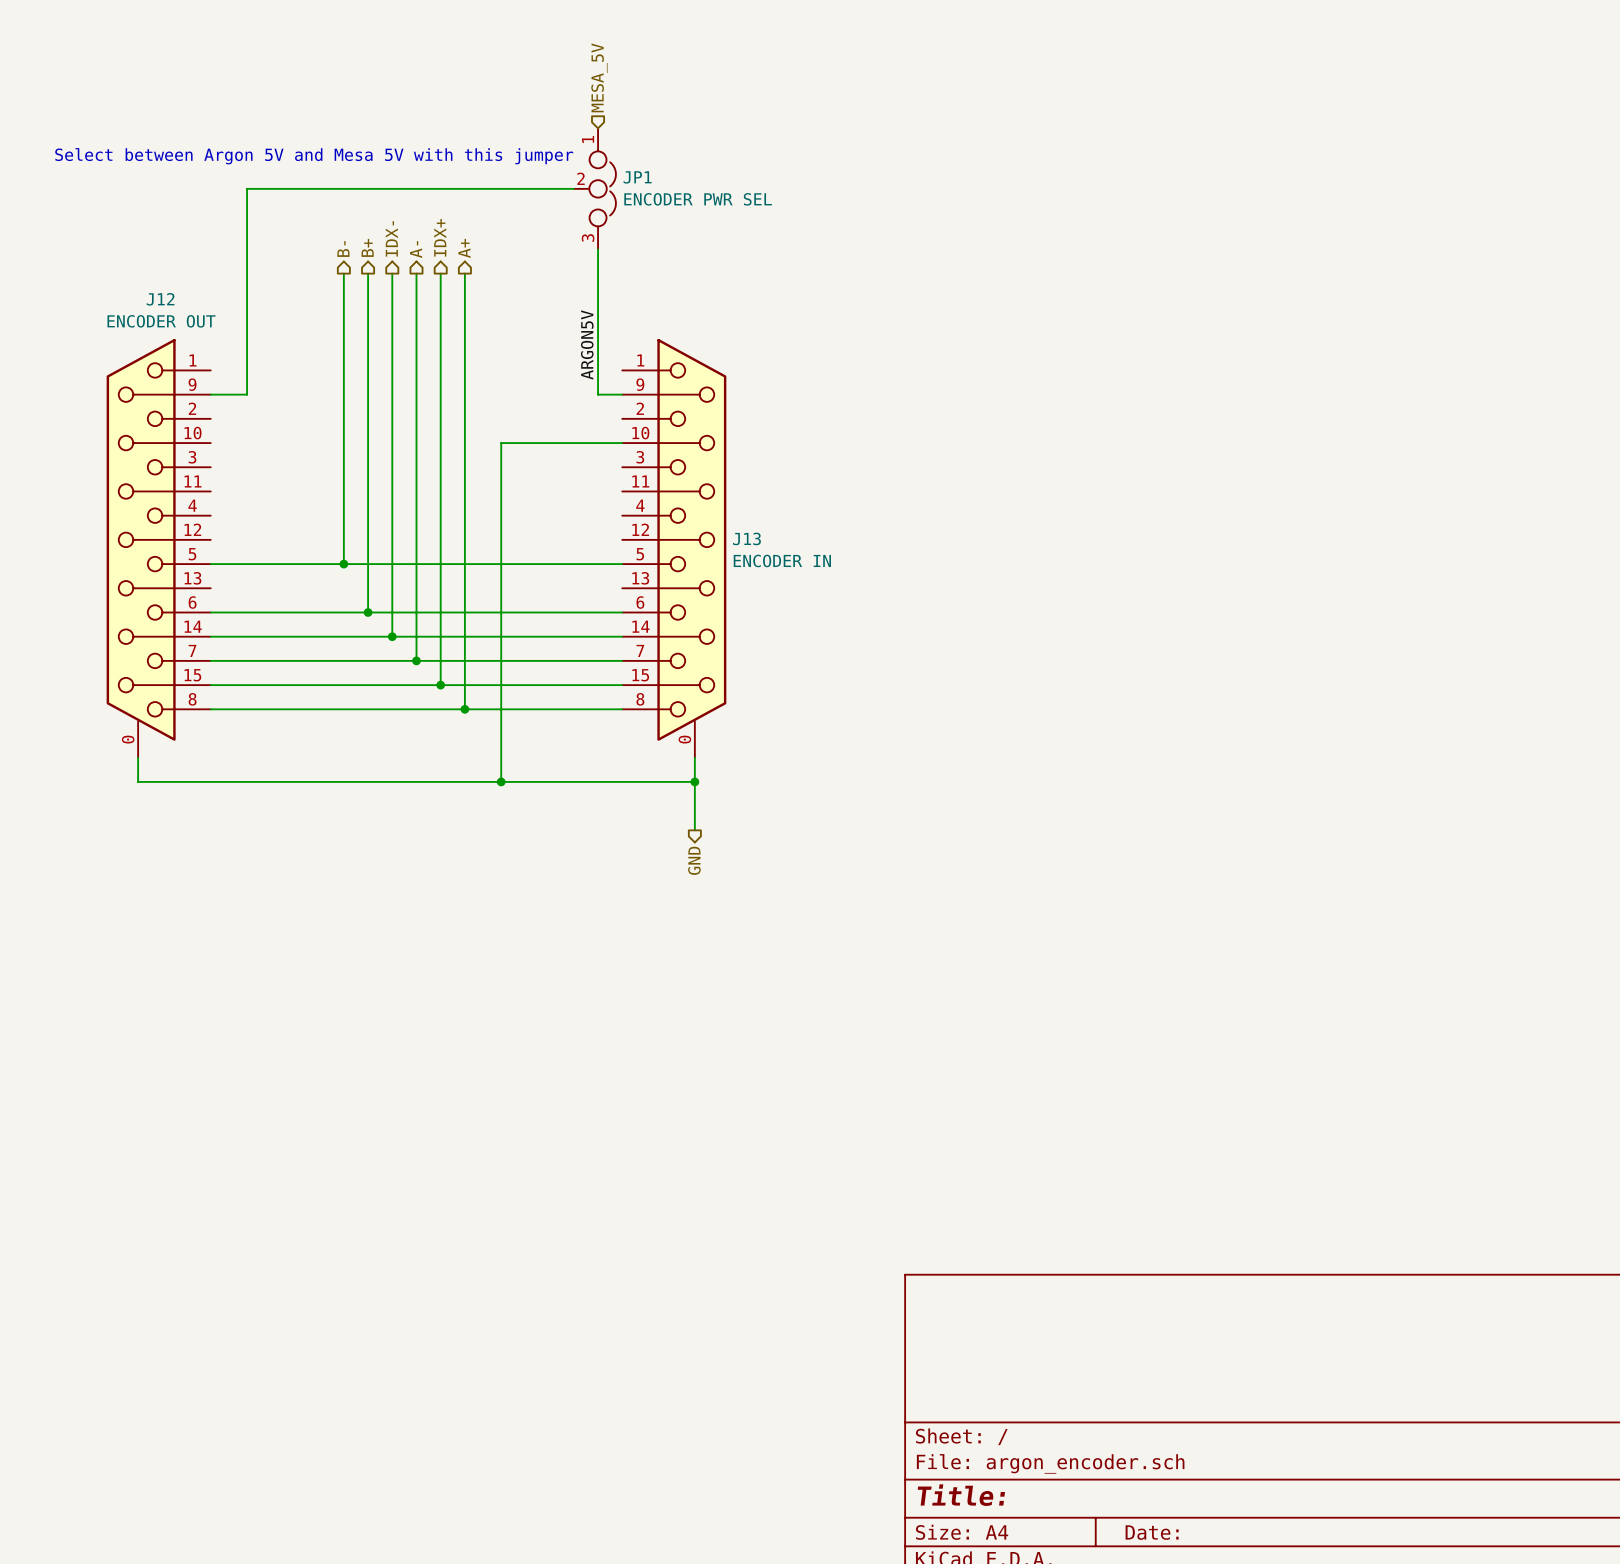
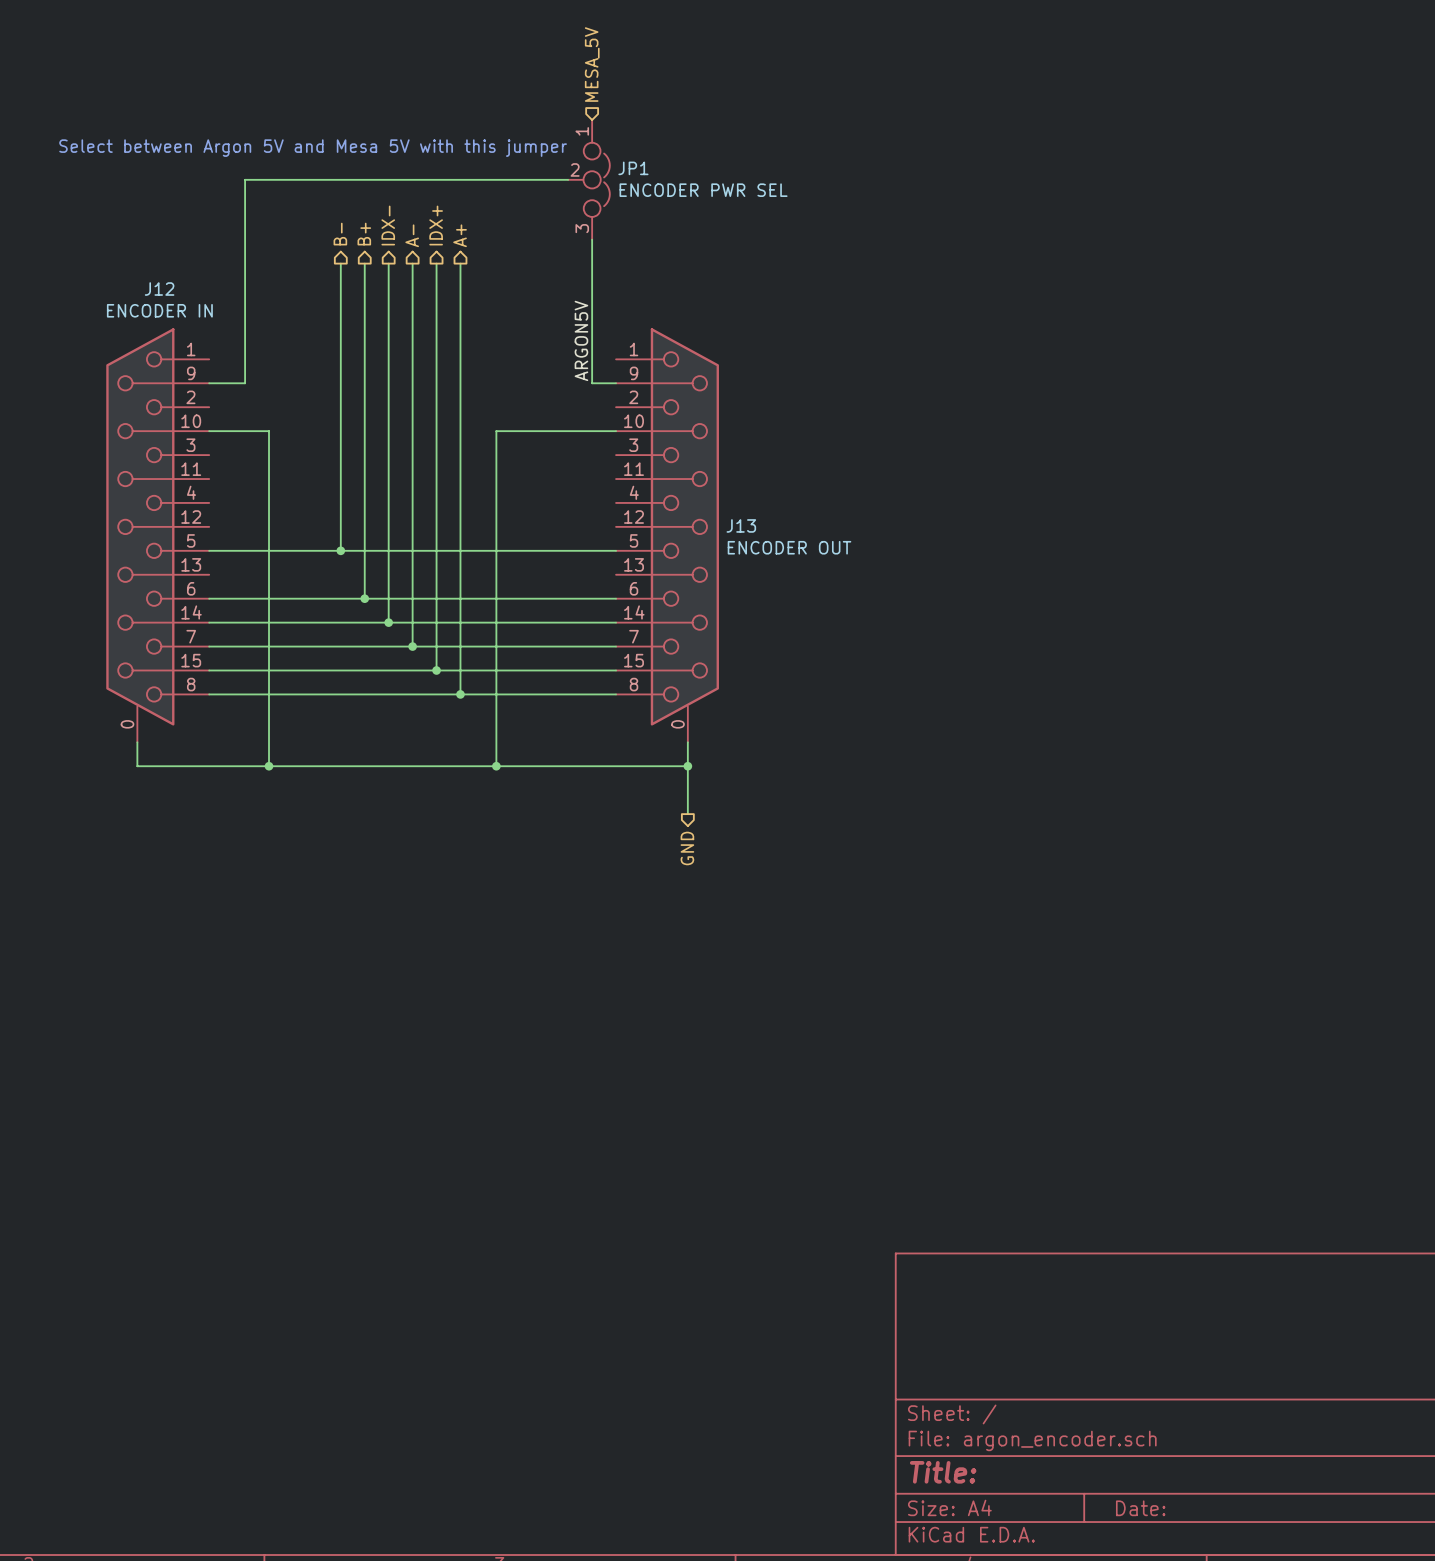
J12 value: ENCODER OUT (161, 321) -> ENCODER IN (159, 310)
wire: none -> (209, 431) (269, 431) (269, 766)
J13 value: ENCODER IN (782, 560) -> ENCODER OUT (789, 547)
junction: none -> (269, 766)

